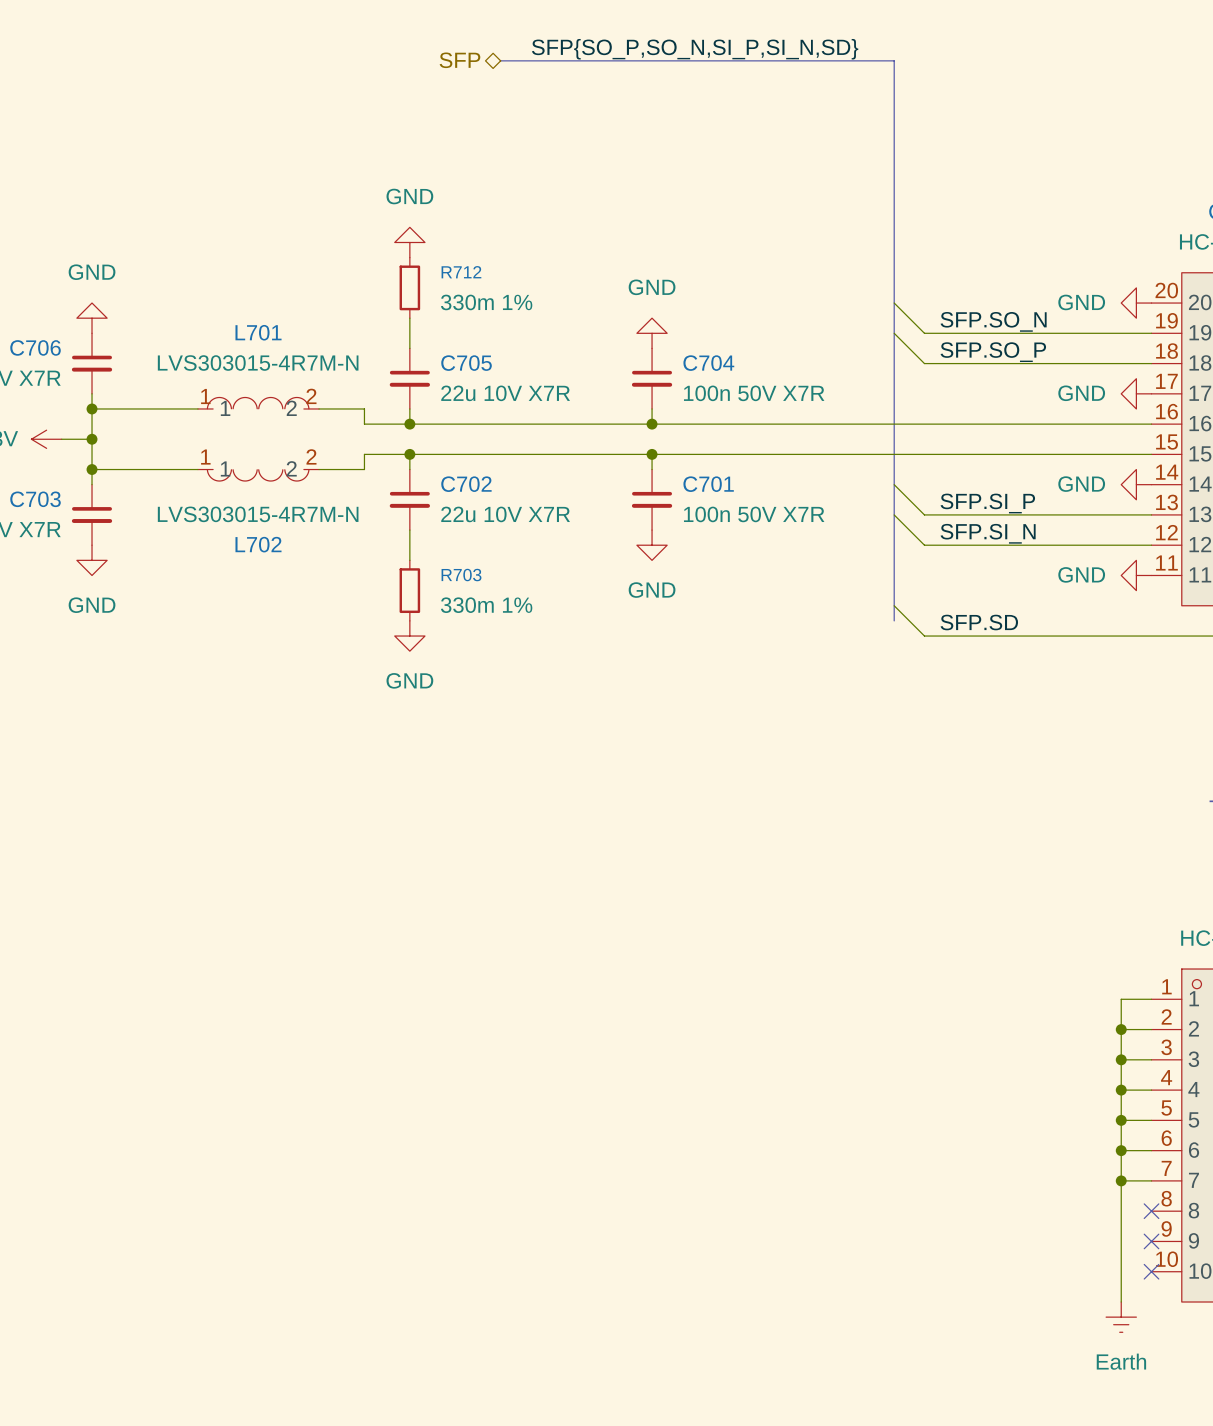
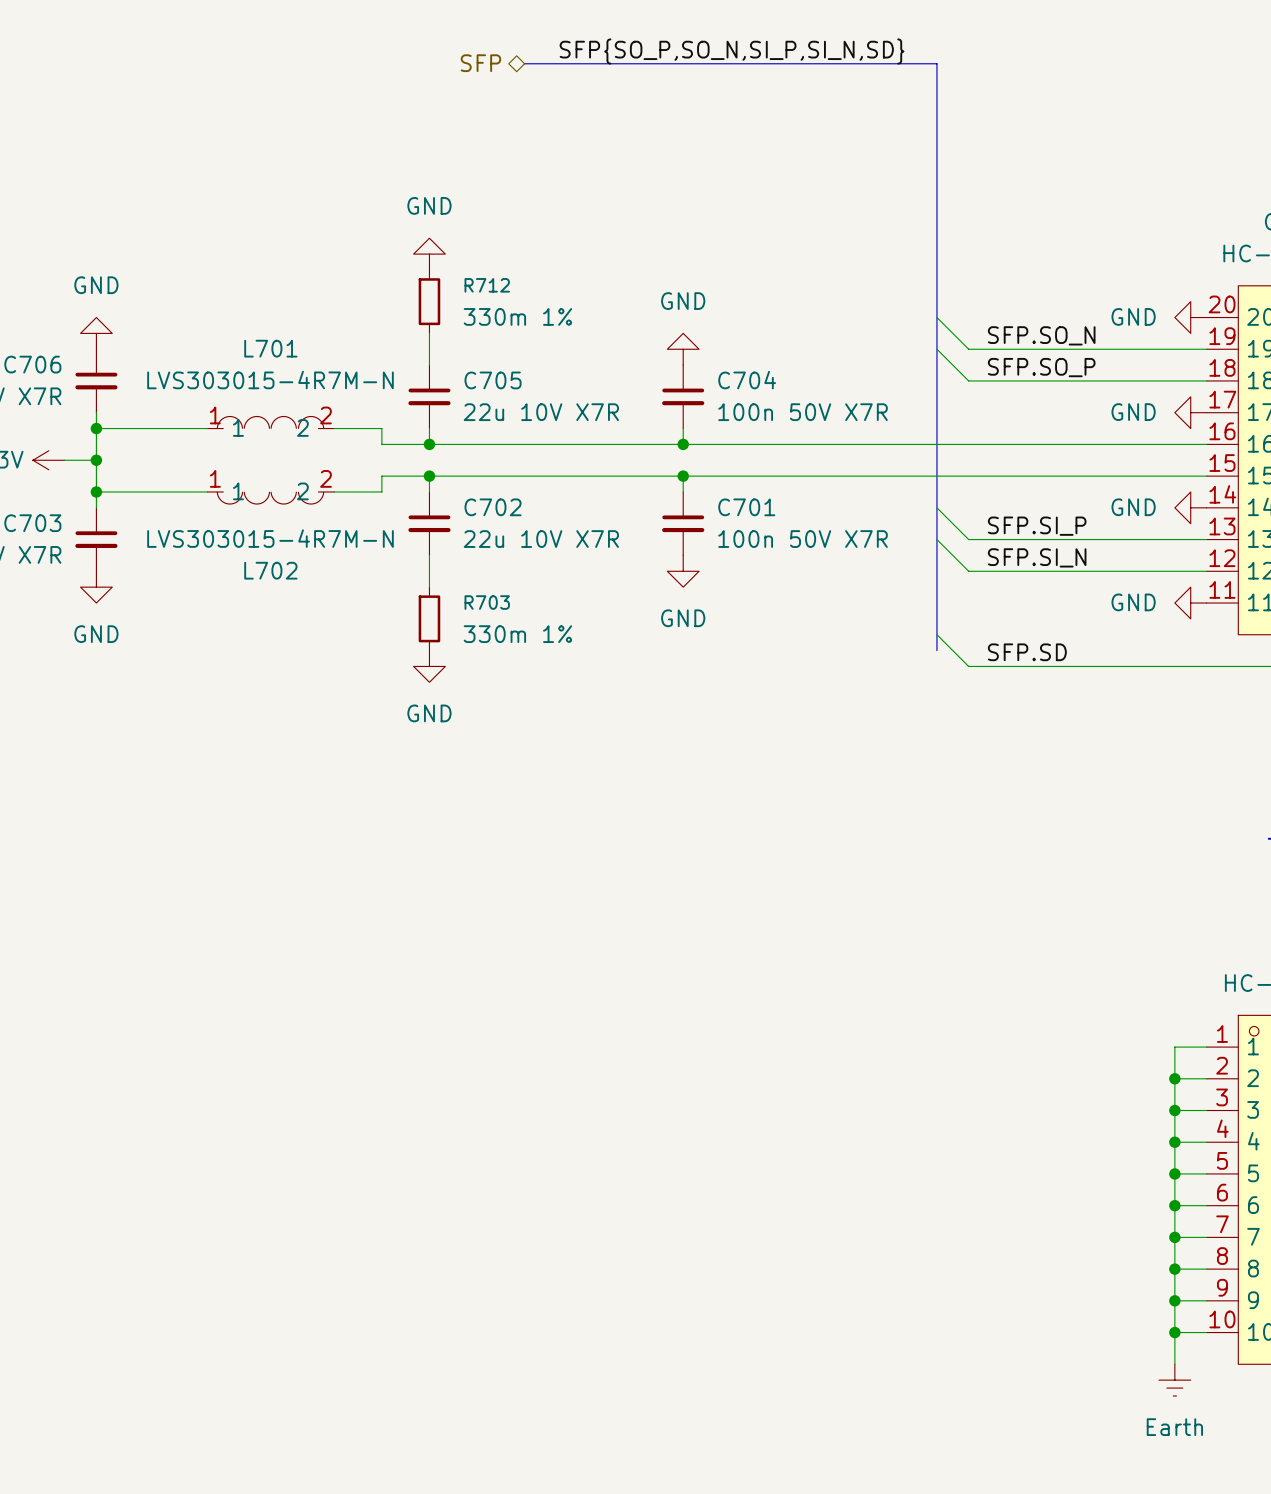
wire: none -> (1174, 1269) (1206, 1269)
junction: none -> (1174, 1269)
no-connect mark: (1151, 1211) -> none
wire: none -> (1174, 1300) (1206, 1300)
junction: none -> (1174, 1300)
no-connect mark: (1151, 1241) -> none
wire: none -> (1174, 1332) (1206, 1332)
junction: none -> (1174, 1332)
no-connect mark: (1151, 1271) -> none

